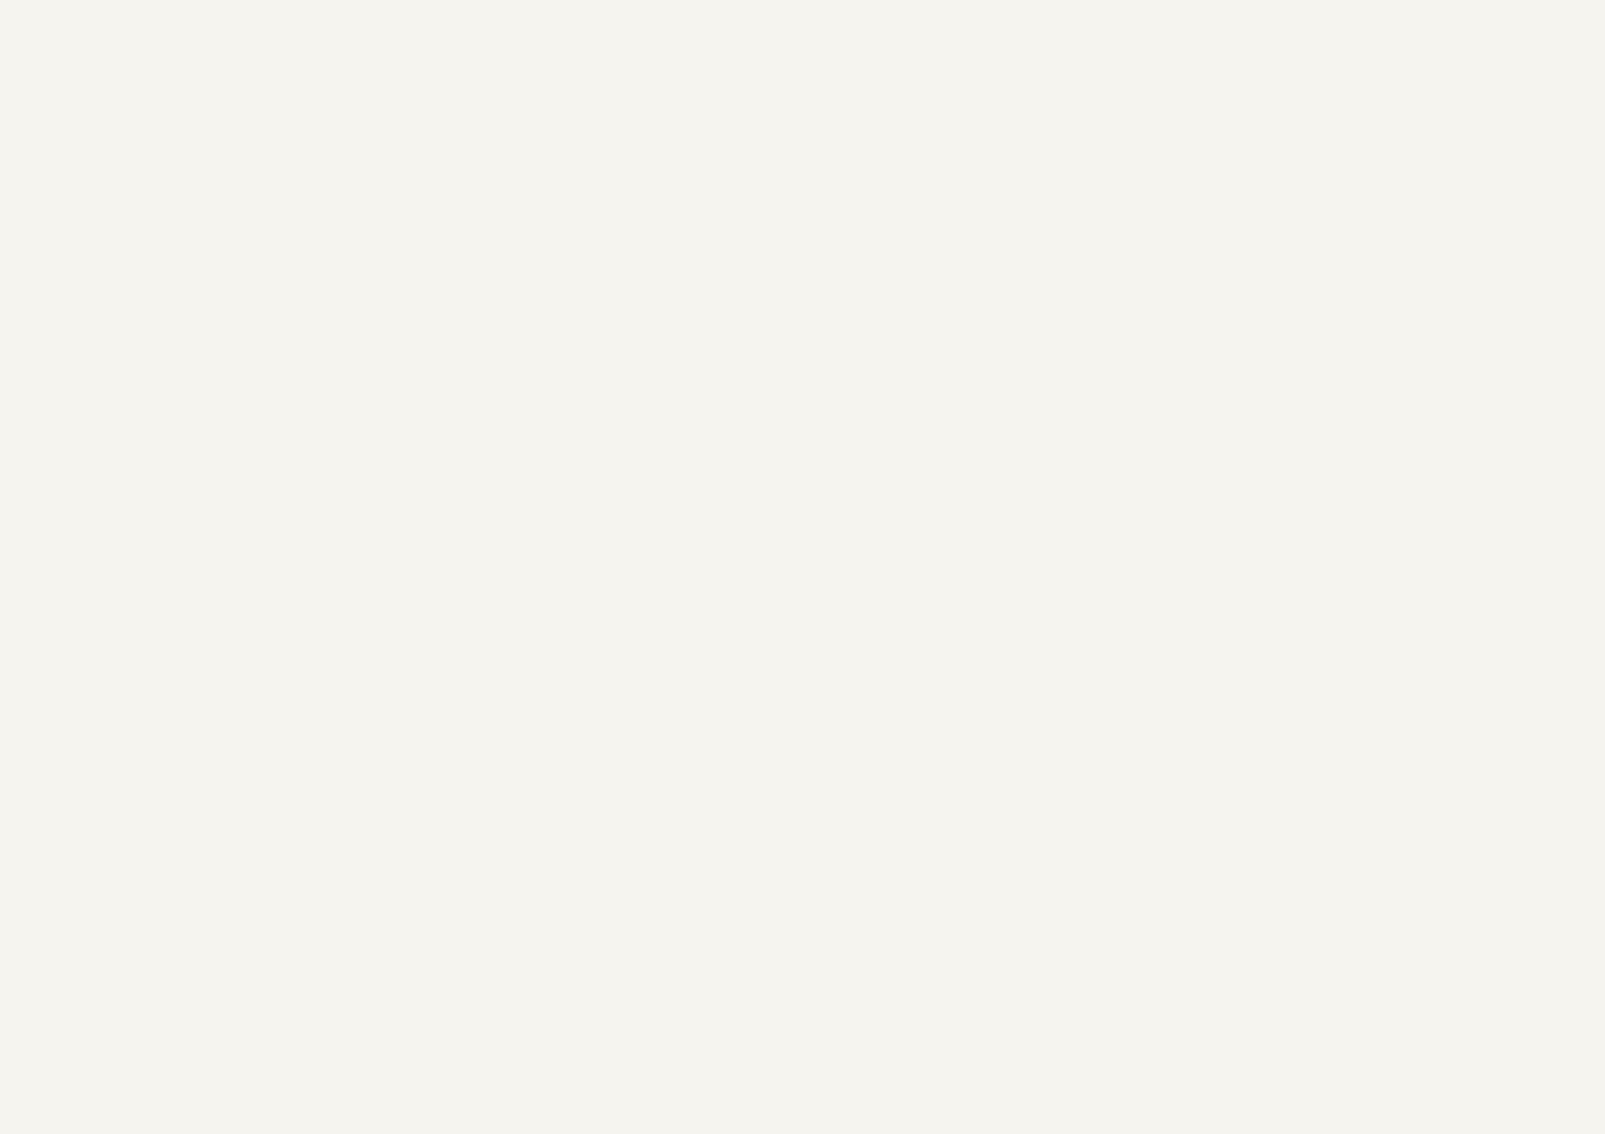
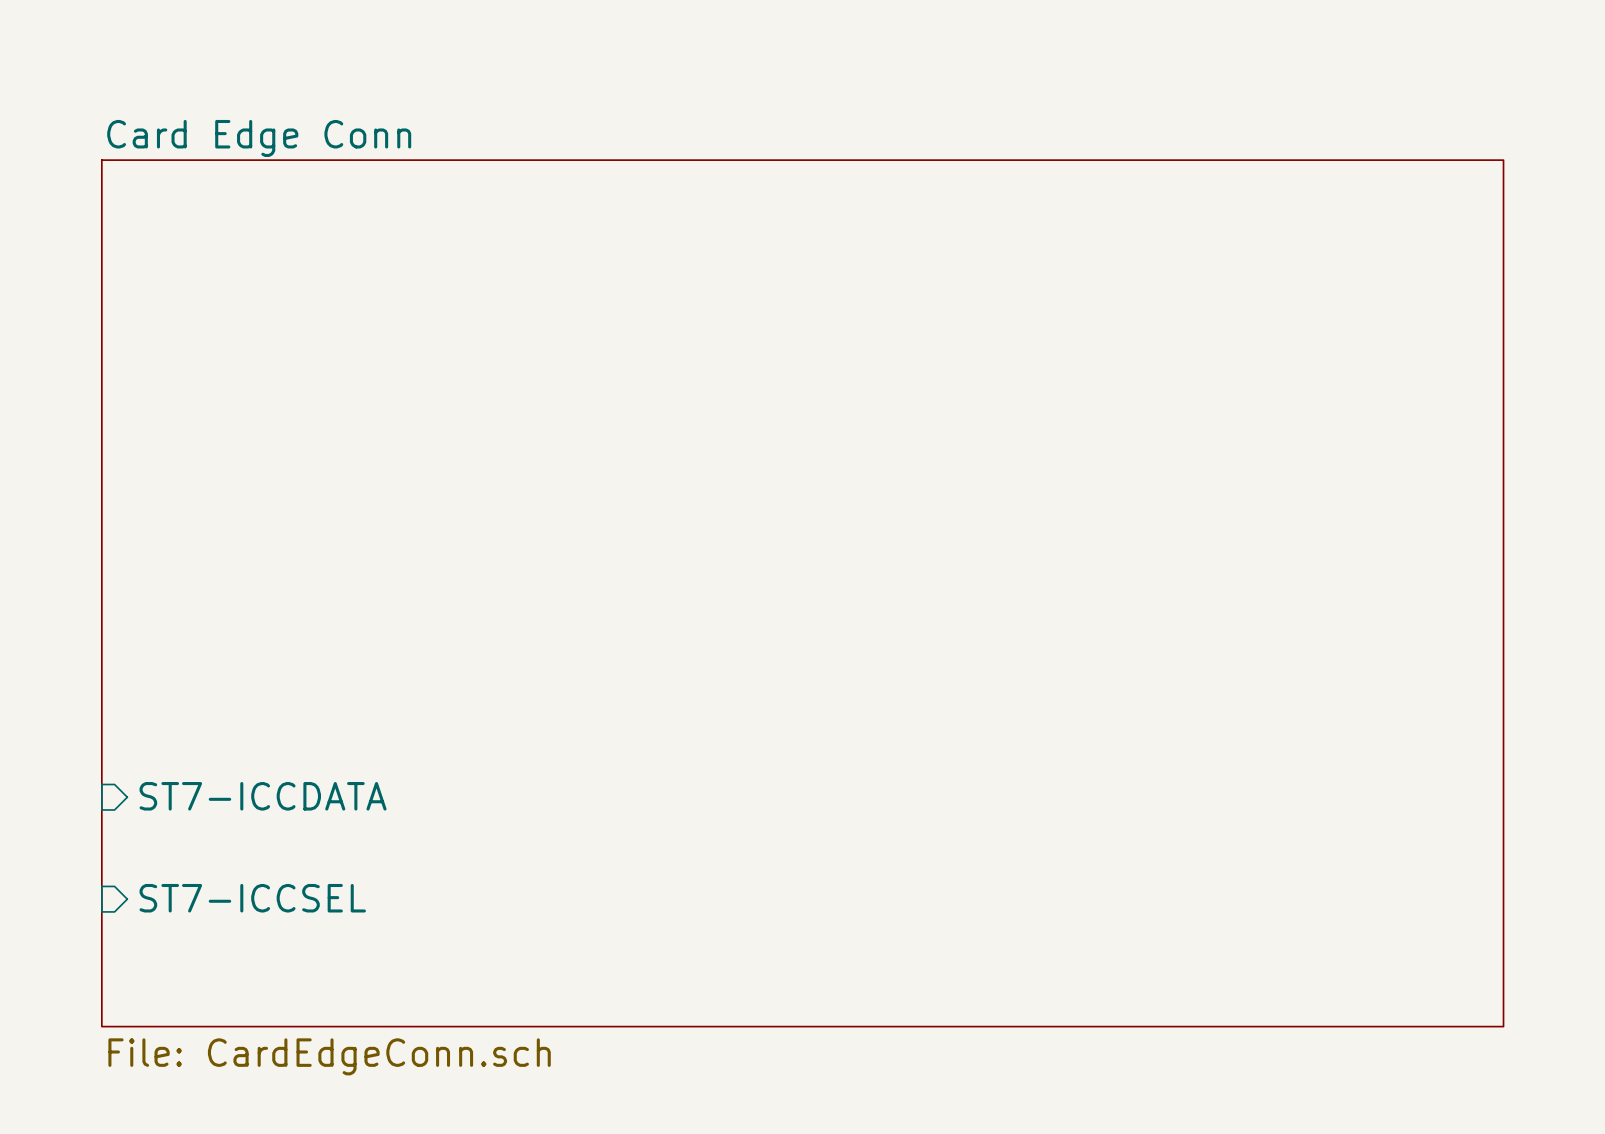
sheet Card Edge Conn: none -> File: CardEdgeConn.sch (802, 593)
sheet pin: none -> ST7-ICCDATA (263, 796)
sheet pin: none -> ST7-ICCSEL (252, 898)

